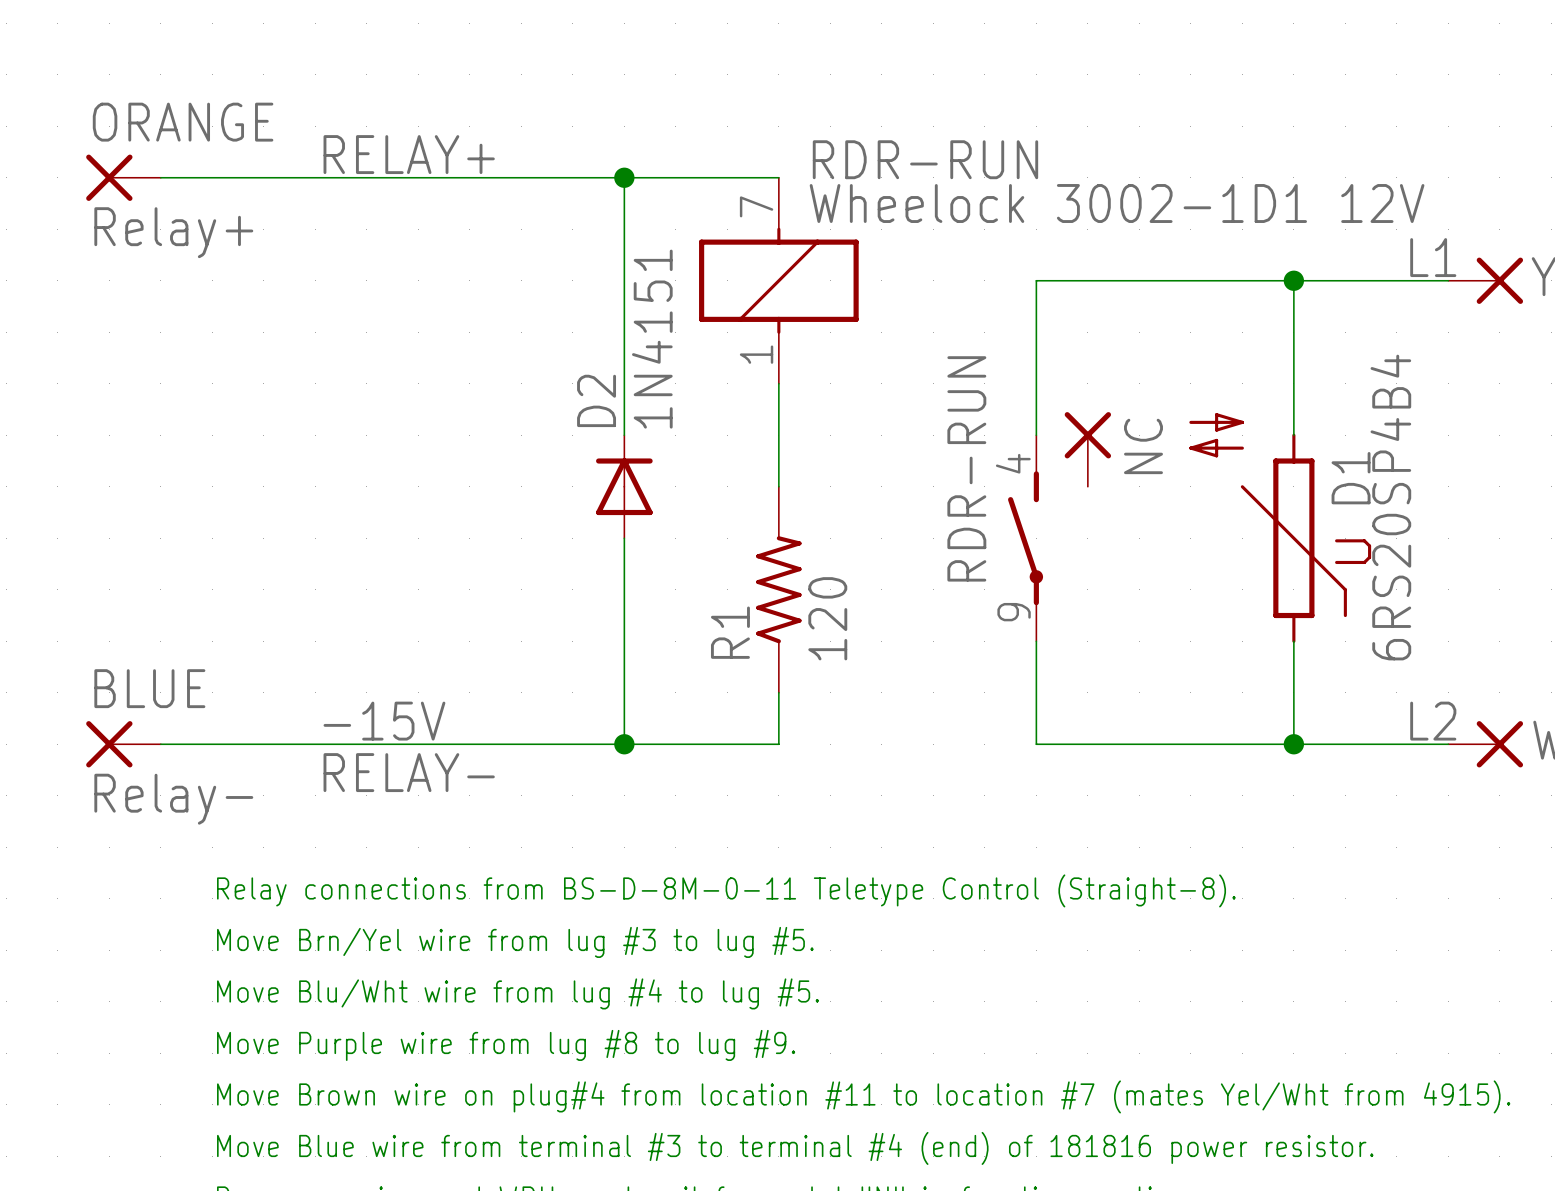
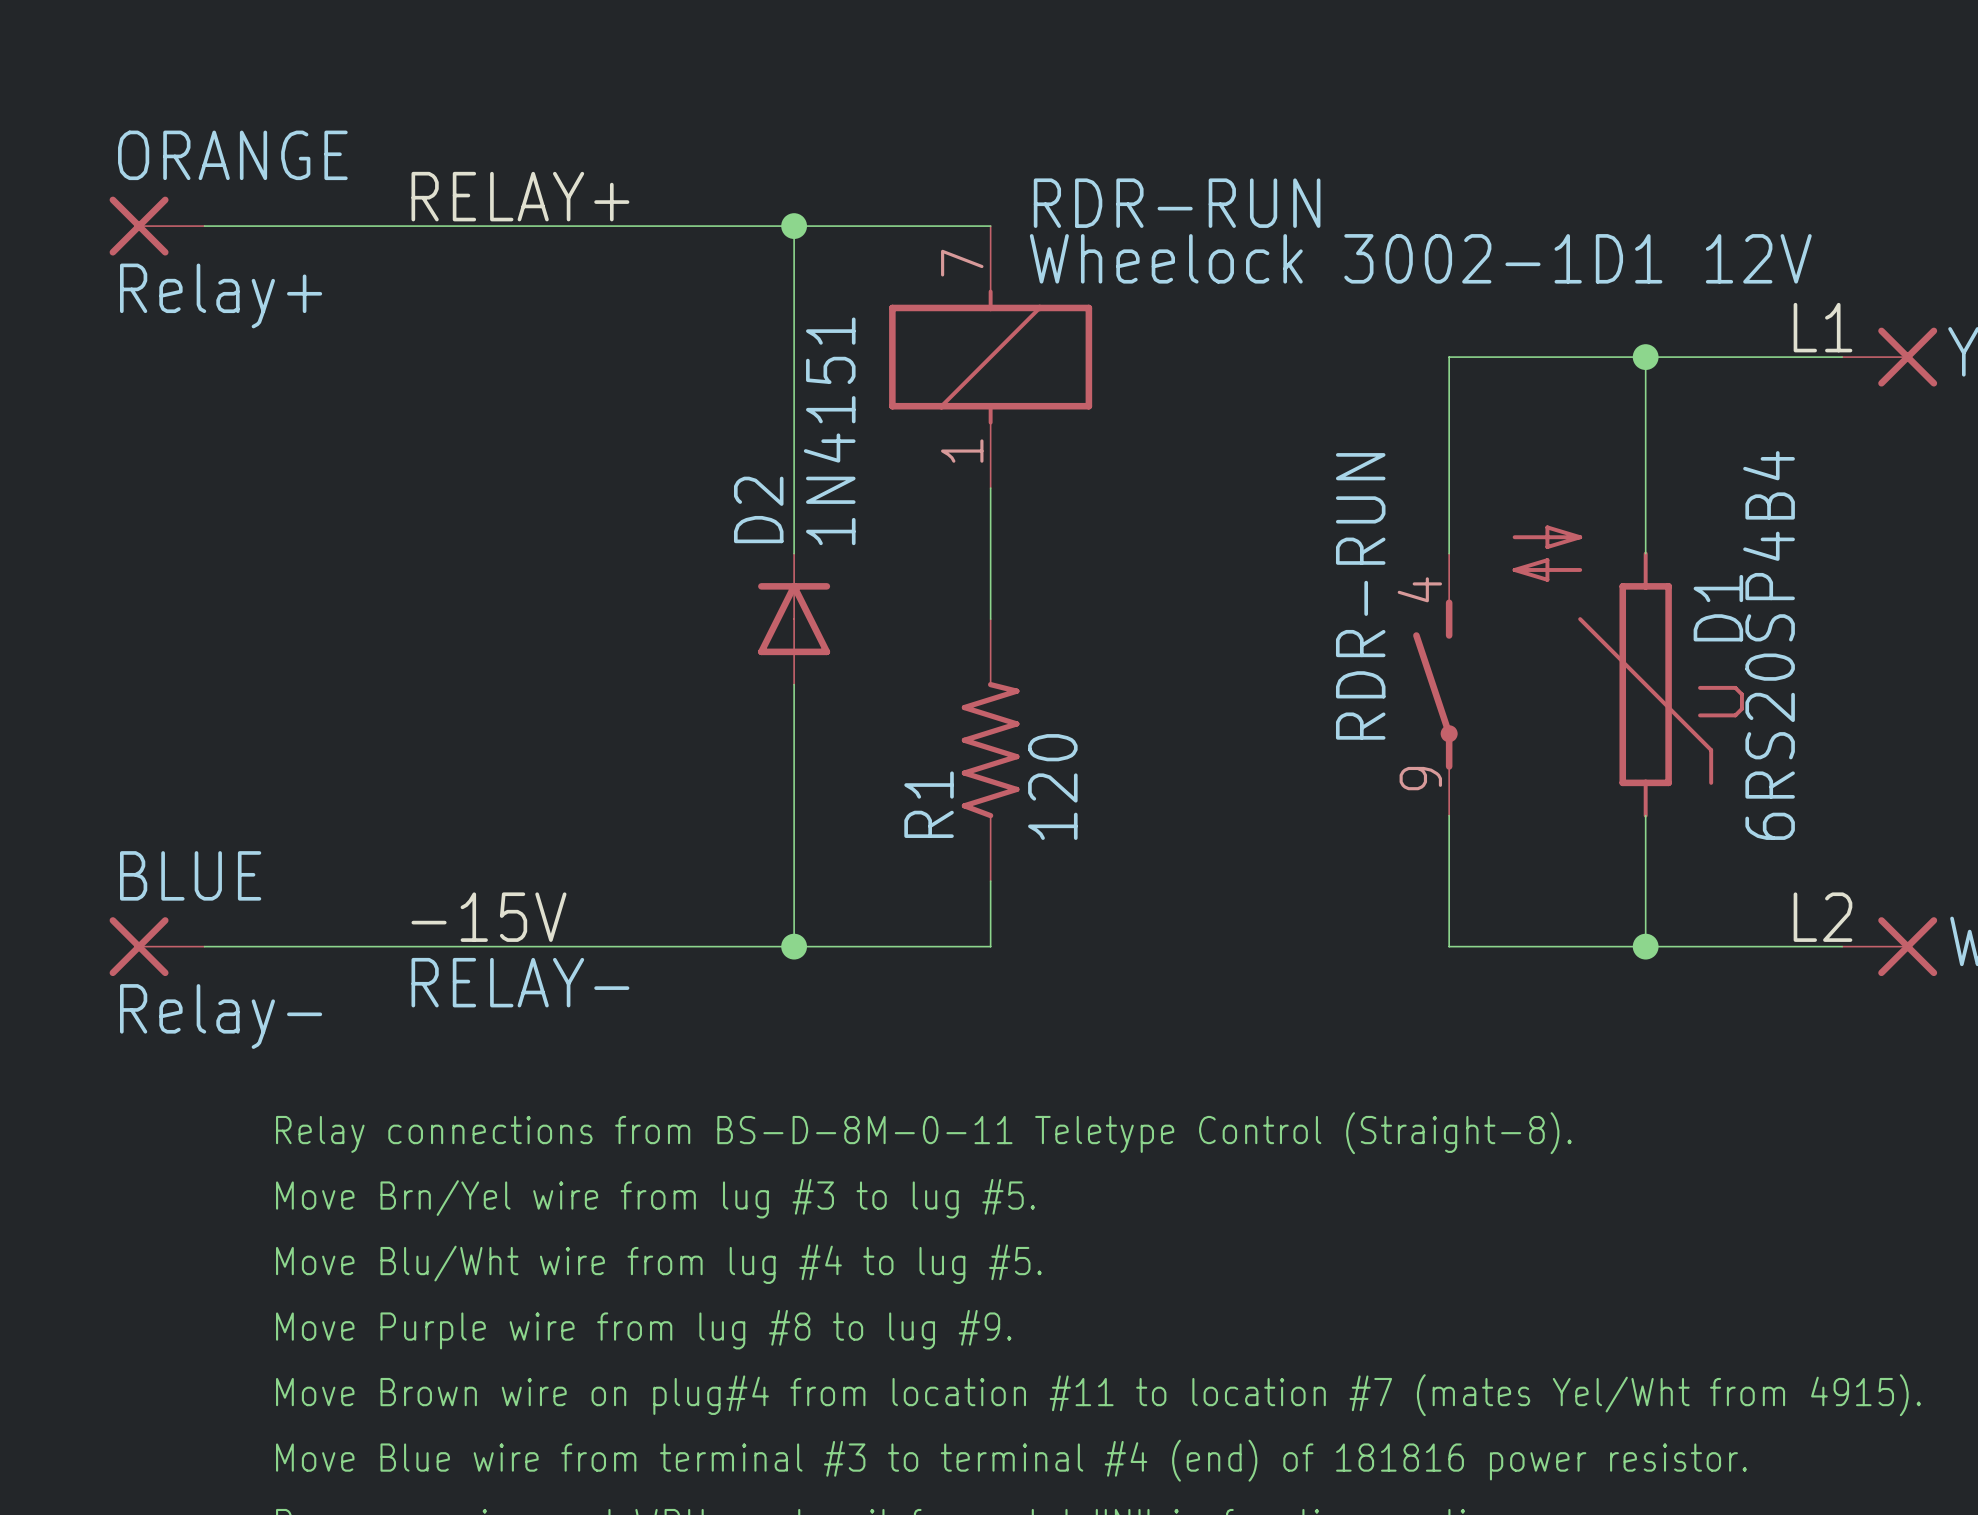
wire: (1139, 280) (1036, 280) (1036, 435) -> (1449, 357) (1449, 553)
NC: (1087, 449) -> none
RDR-RUN position: (1025, 538) -> (1435, 684)
wire: (1036, 641) (1036, 744) (1139, 744) -> (1449, 815) (1449, 946)

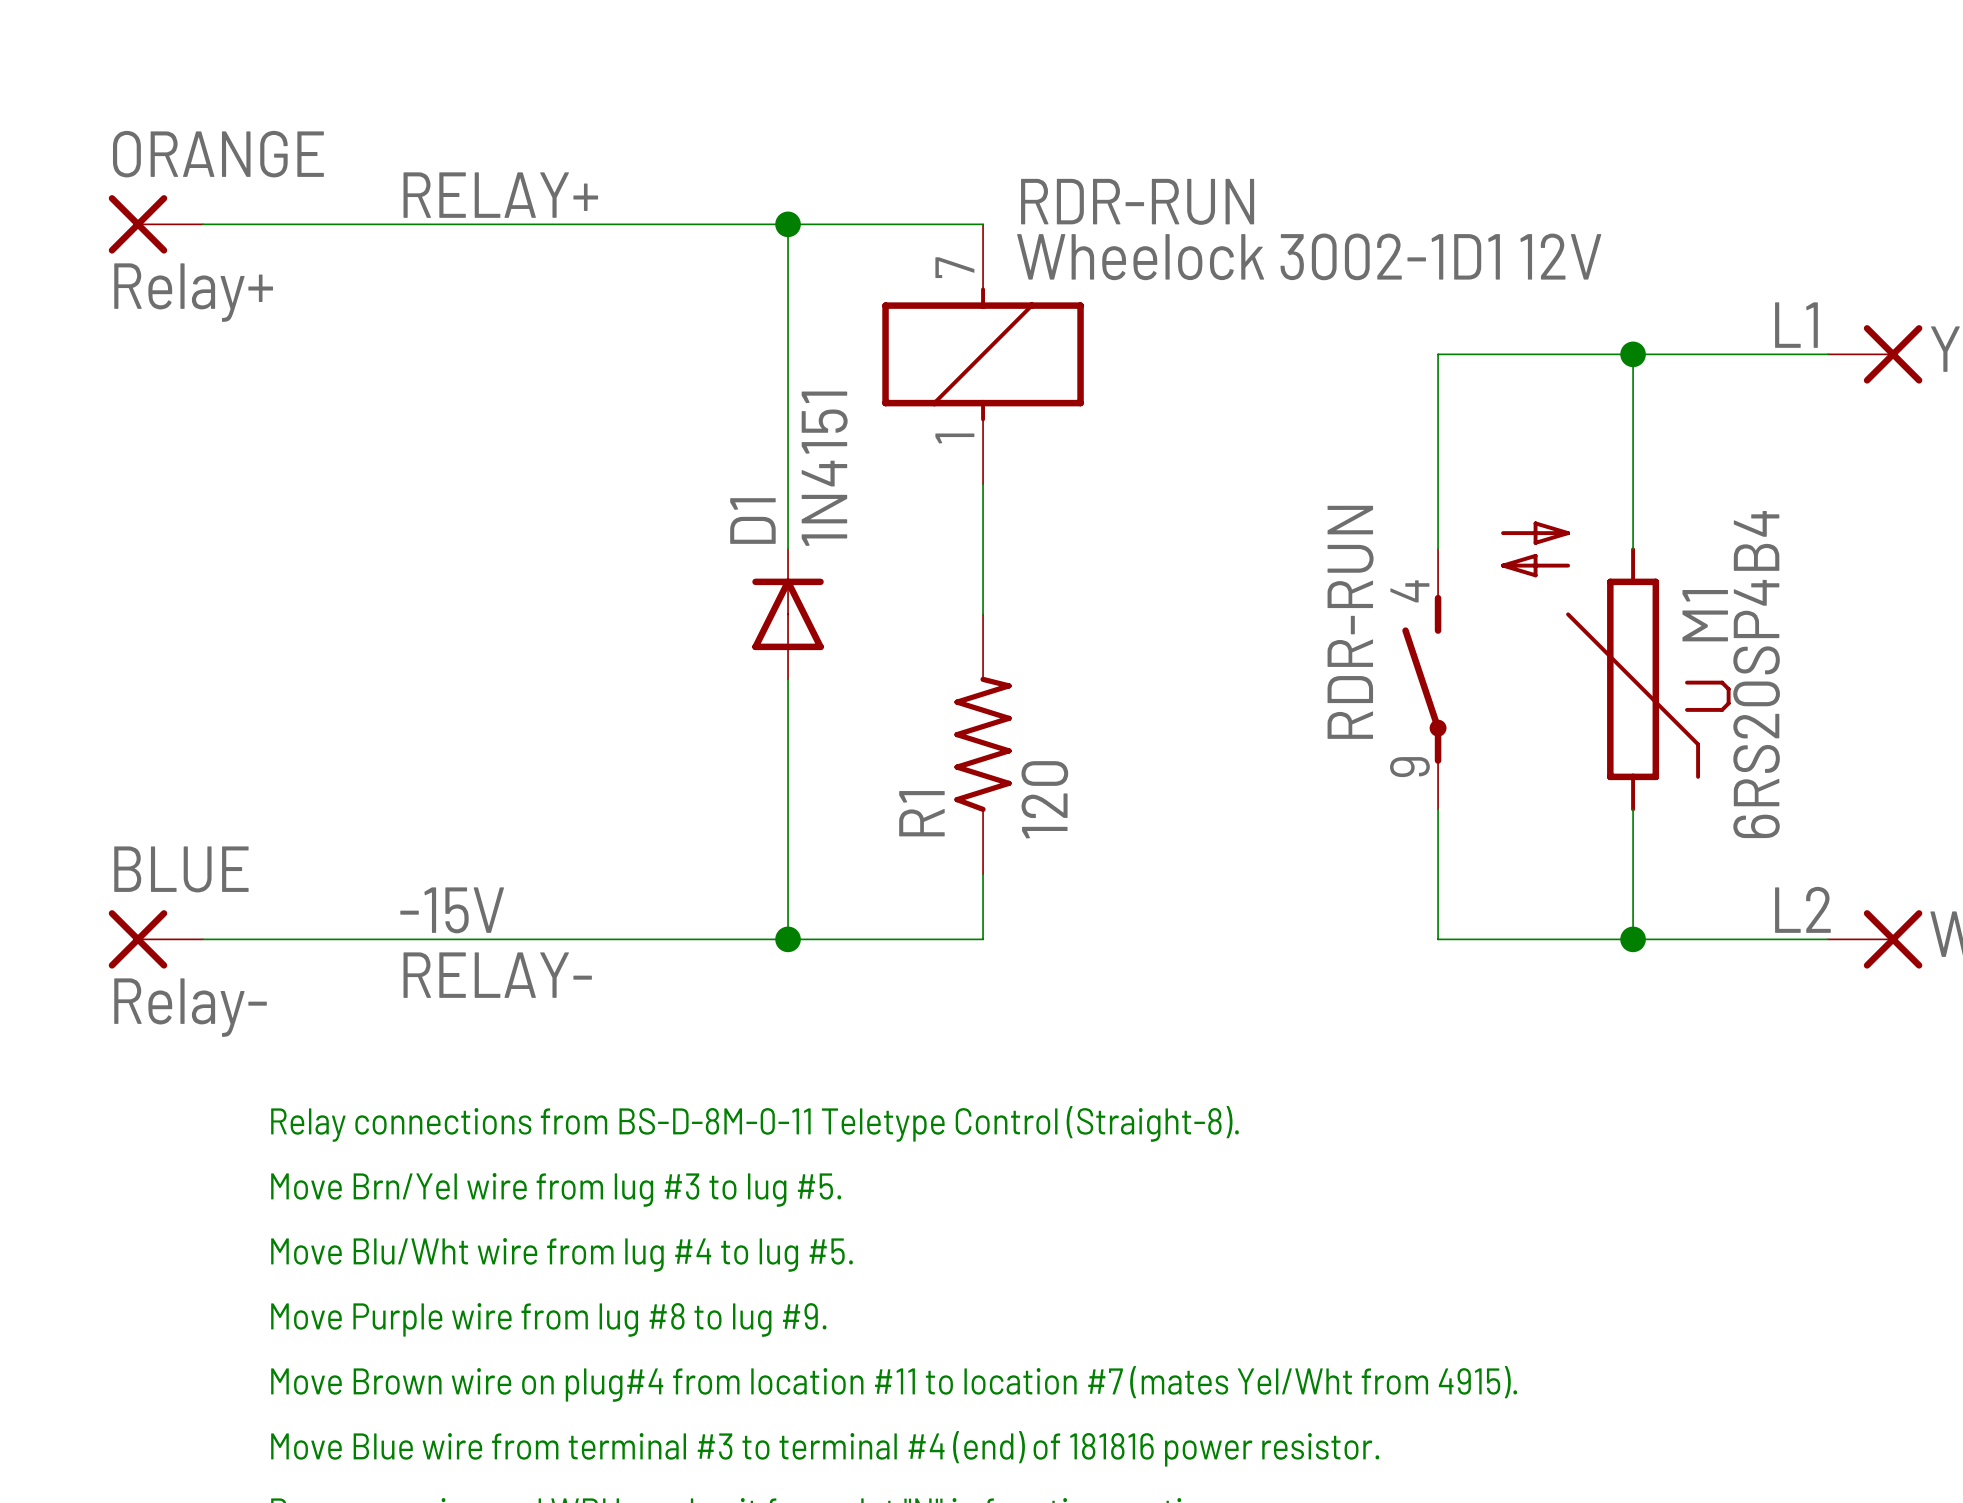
D2 name: D2 (758, 509) -> D1 (752, 521)
D1 name: D1 (1718, 608) -> M1 (1705, 615)

